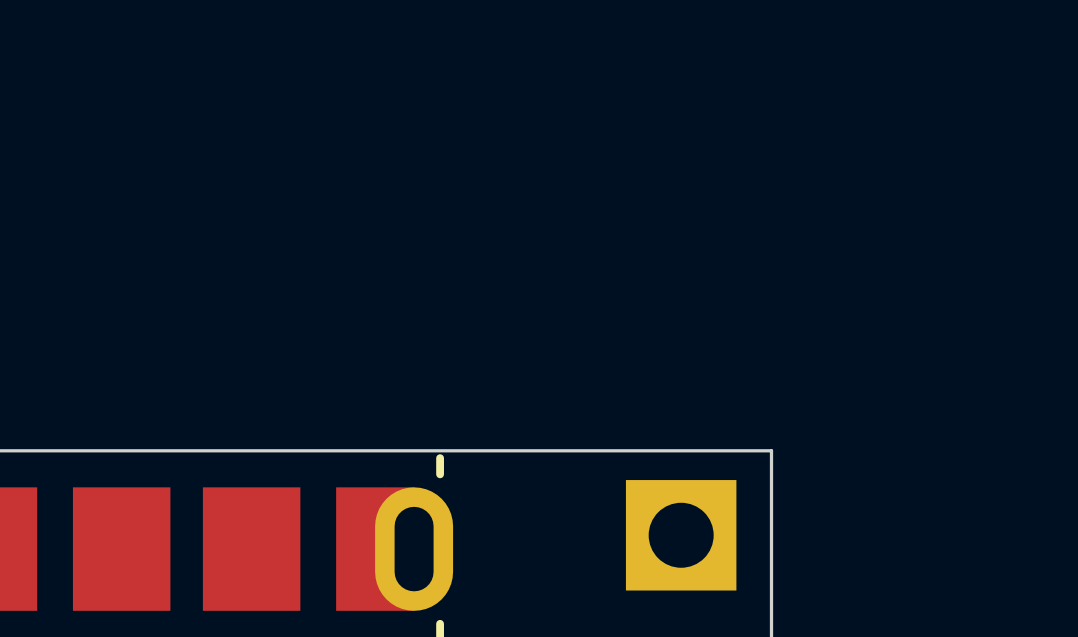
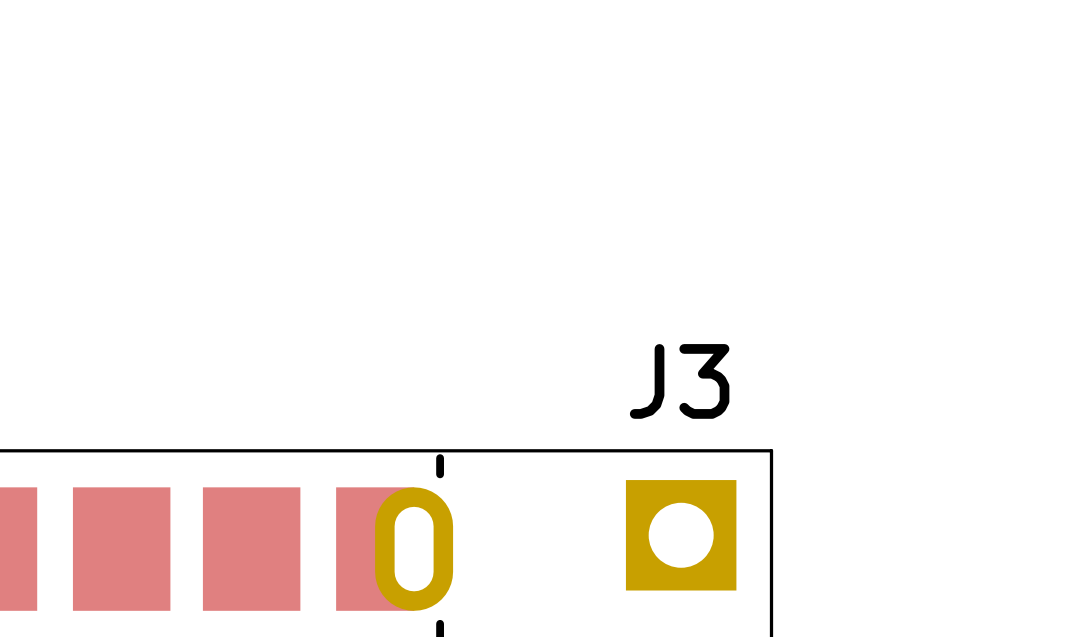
J3 name: none -> J3 (679, 381)

